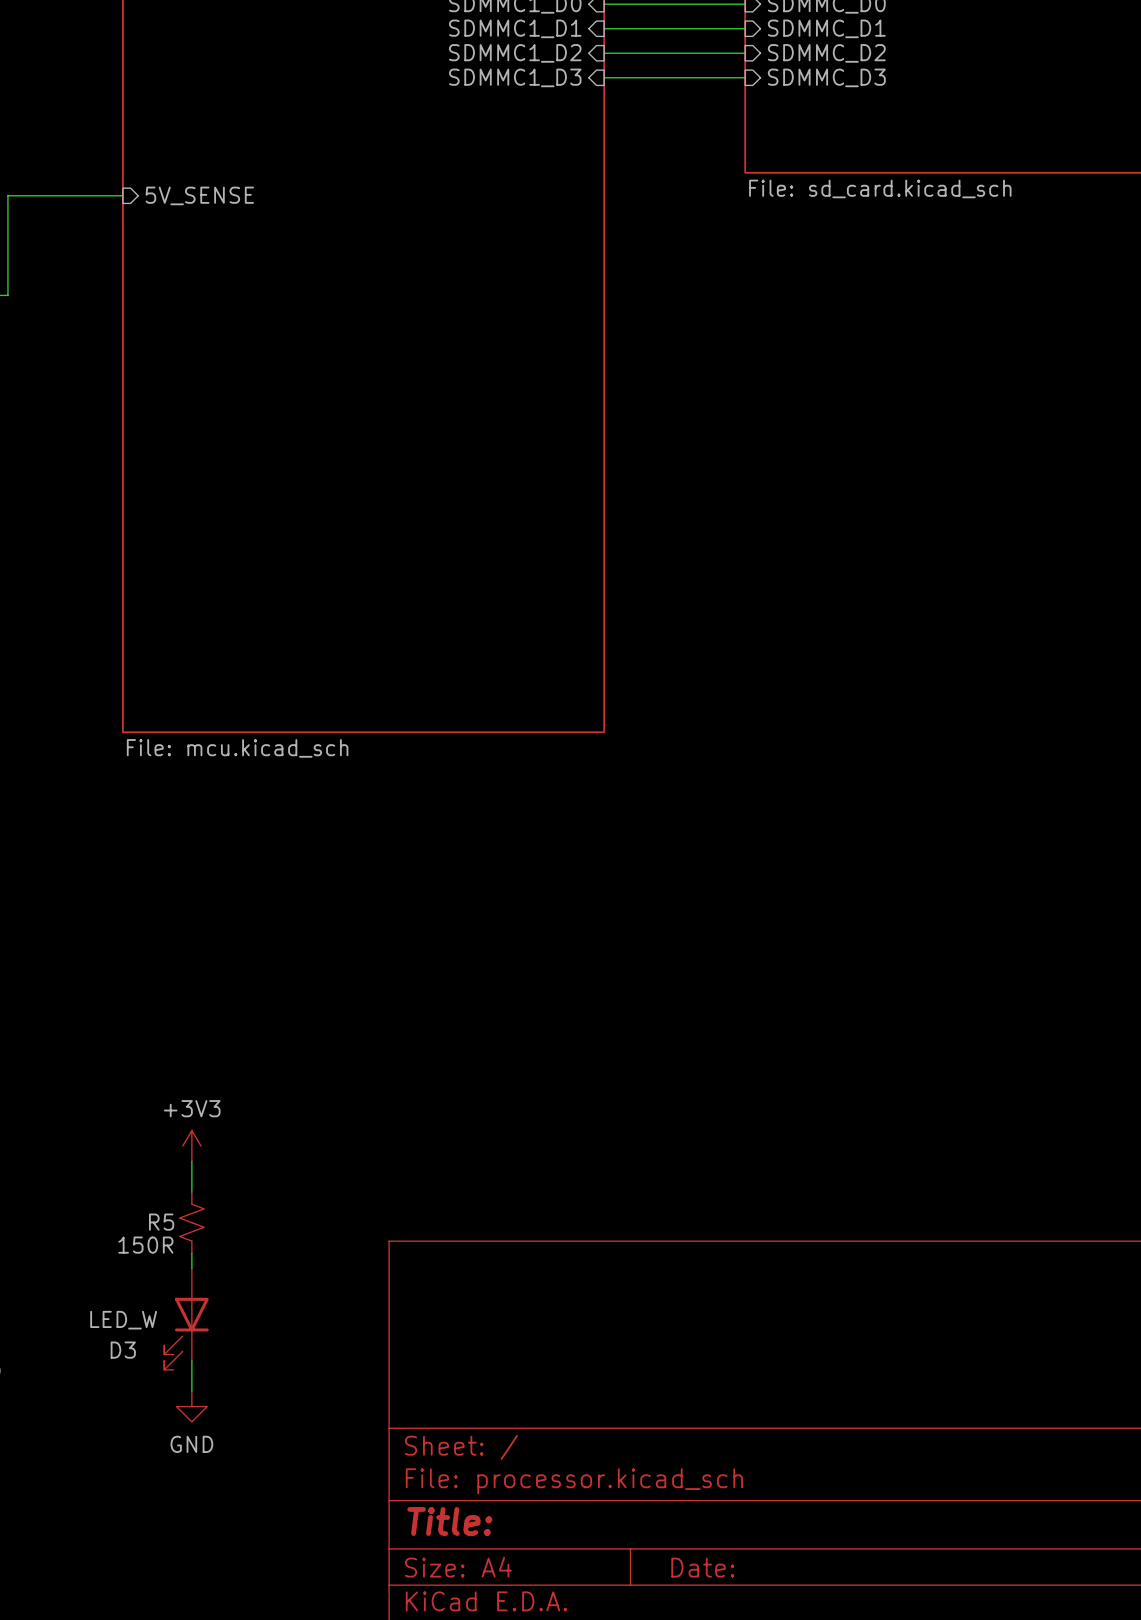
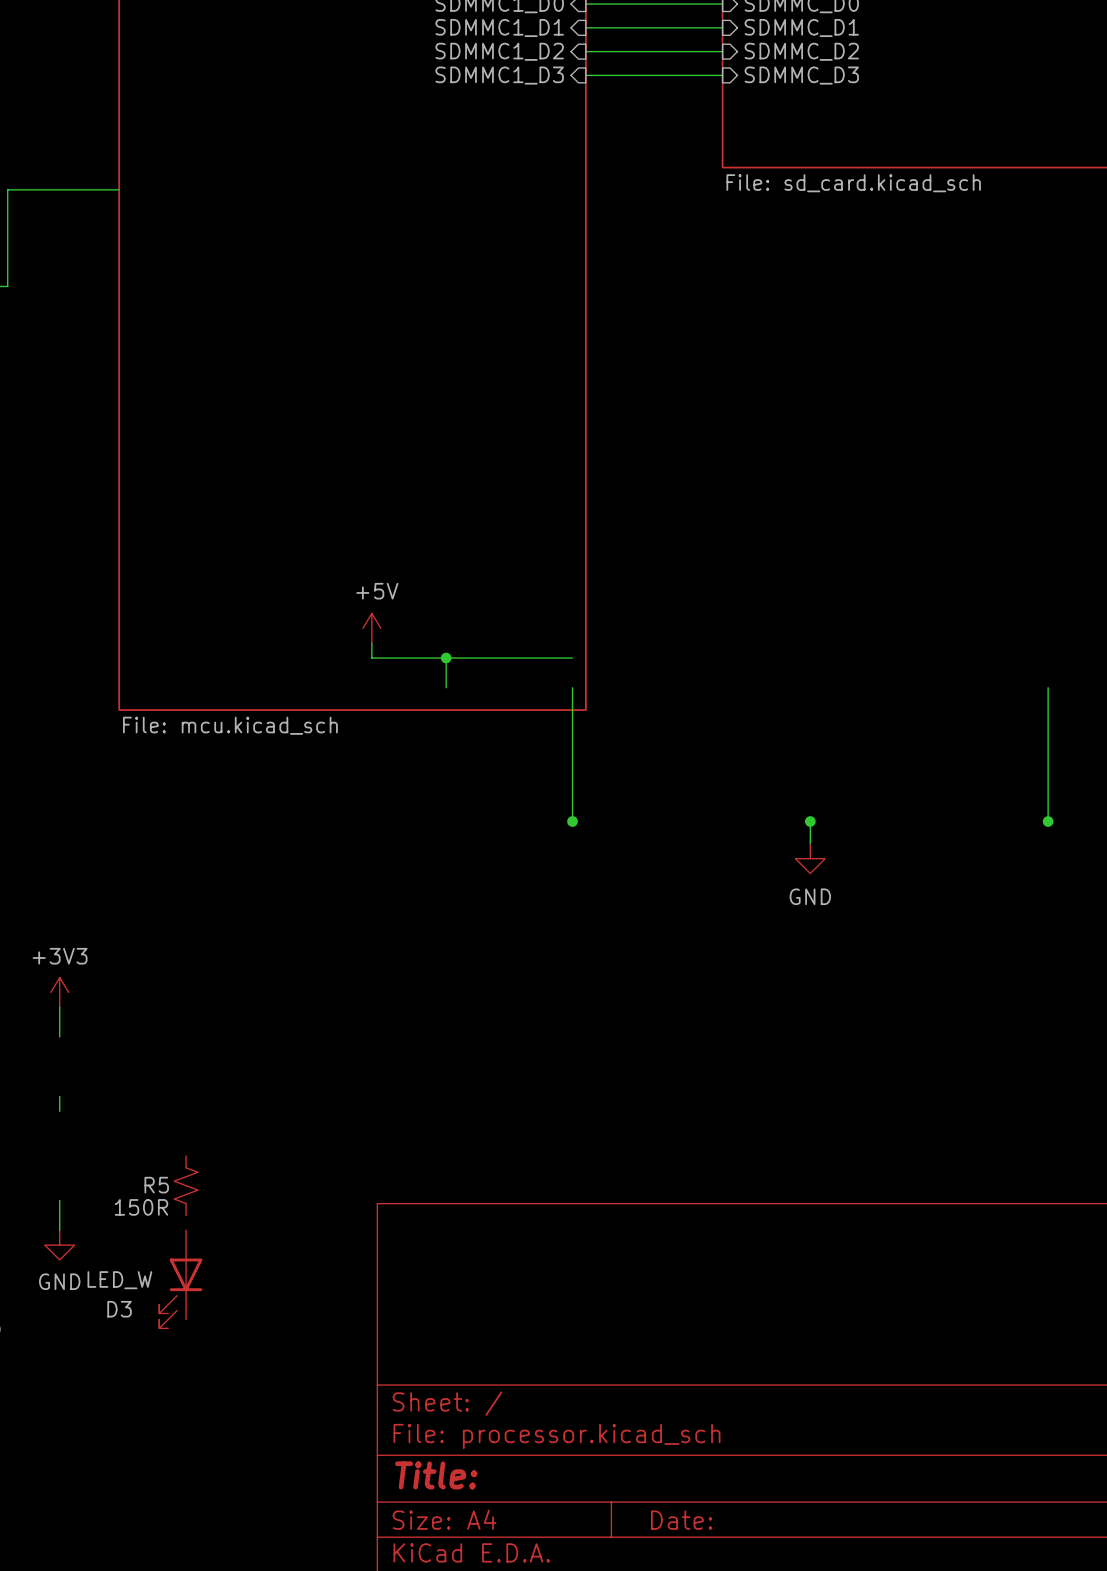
sheet pin: 5V_SENSE (199, 195) -> none
power symbol: none -> +5V (371, 628)
wire: none -> (371, 643) (371, 658) (572, 658)
wire: none -> (446, 658) (446, 687)
junction: none -> (446, 658)
wire: none -> (572, 687) (572, 821)
wire: none -> (1048, 687) (1048, 821)
junction: none -> (572, 821)
wire: none -> (810, 821) (810, 843)
junction: none -> (810, 821)
junction: none -> (1048, 821)
power symbol: none -> GND (810, 858)
power symbol position: +3V3 (191, 1146) -> +3V3 (59, 992)
wire: (191, 1161) (191, 1192) -> (59, 1007) (59, 1037)
wire: (191, 1253) (191, 1268) -> (59, 1096) (59, 1111)
power symbol: none -> GND (59, 1245)
wire: (191, 1360) (191, 1391) -> (59, 1200) (59, 1230)
power symbol: GND (191, 1406) -> none

